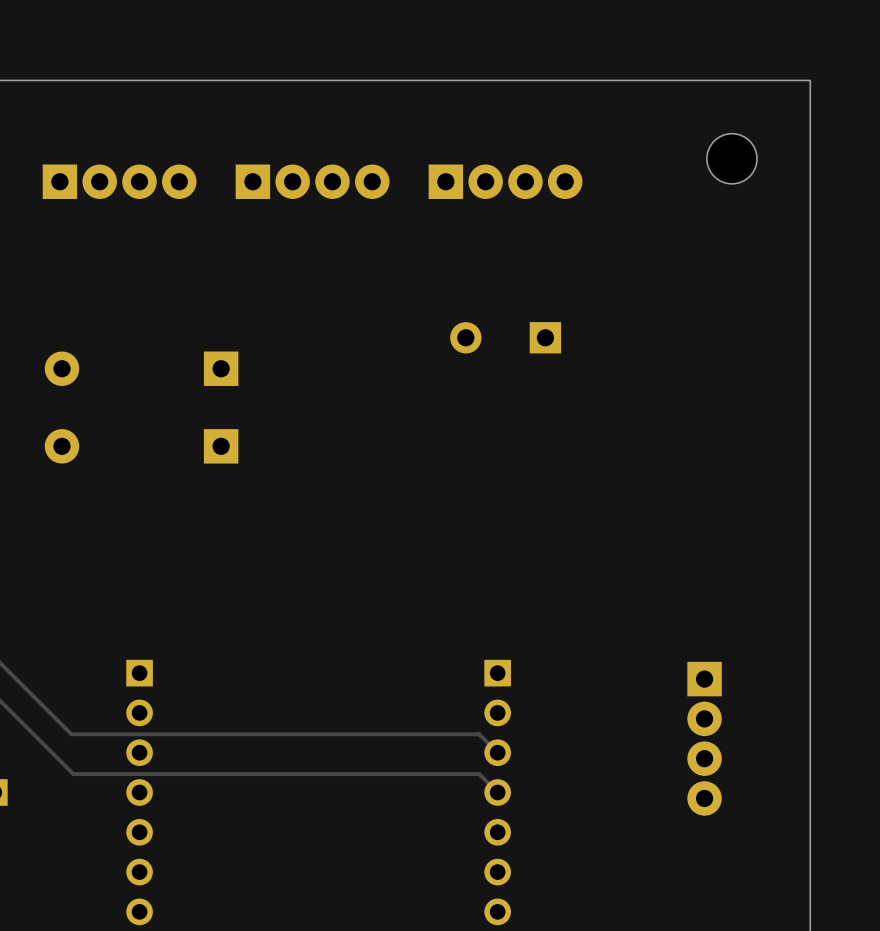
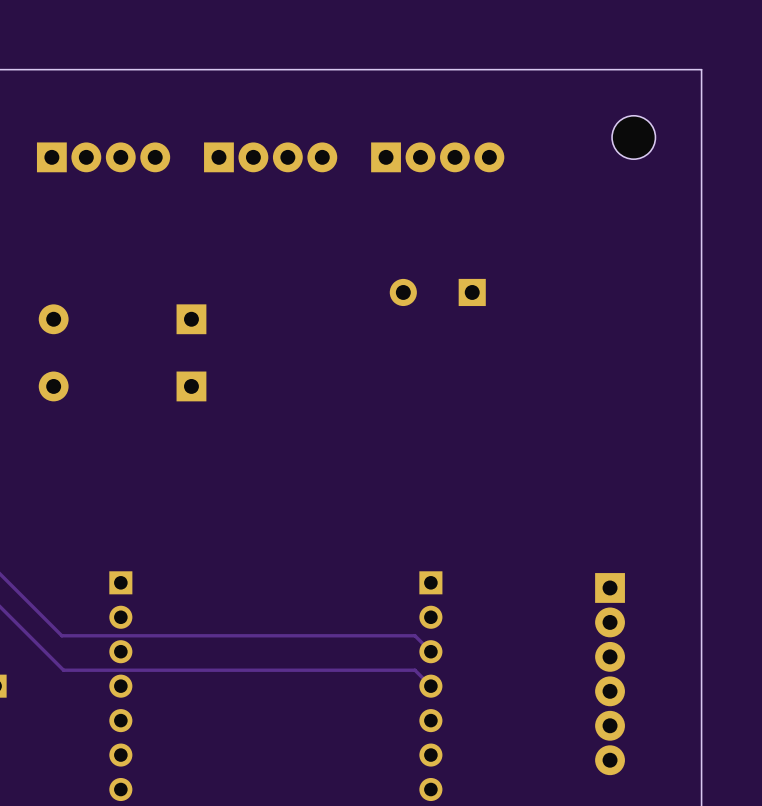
part: none -> (610, 674)

